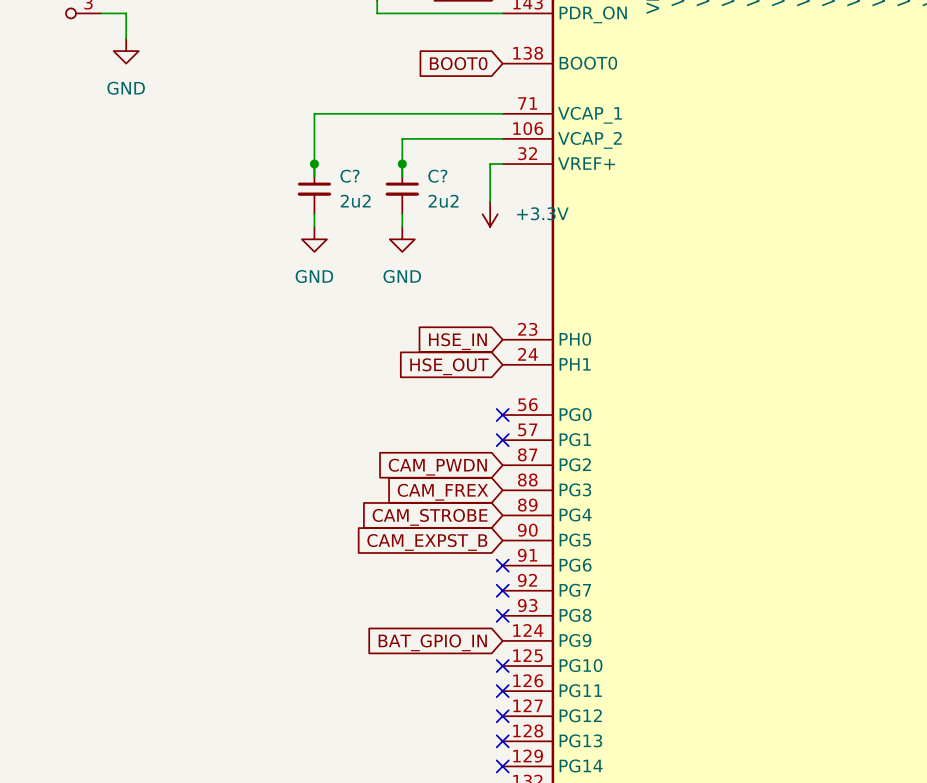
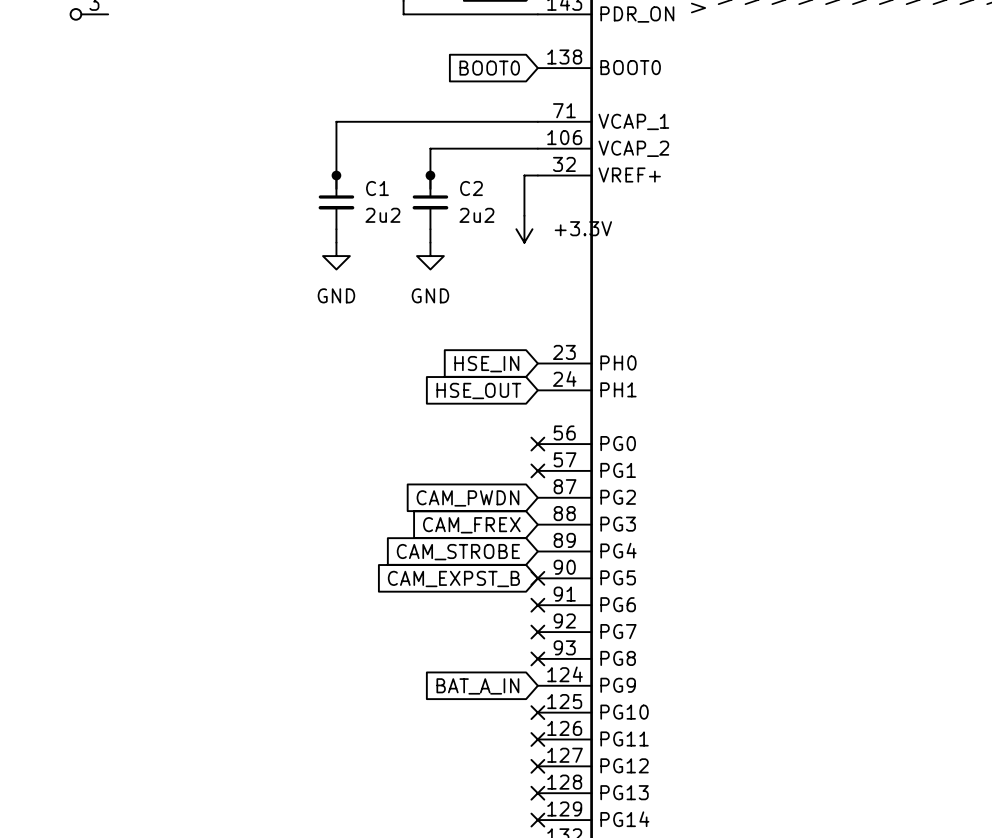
wire: (101, 13) (126, 13) (126, 38) -> none
power symbol: GND (126, 51) -> none
C? name: C? (350, 176) -> C1 (377, 188)
C? name: C? (437, 176) -> C2 (471, 188)
no-connect mark: none -> (537, 578)
global label: BAT_GPIO_IN (432, 642) -> BAT_A_IN (477, 686)

